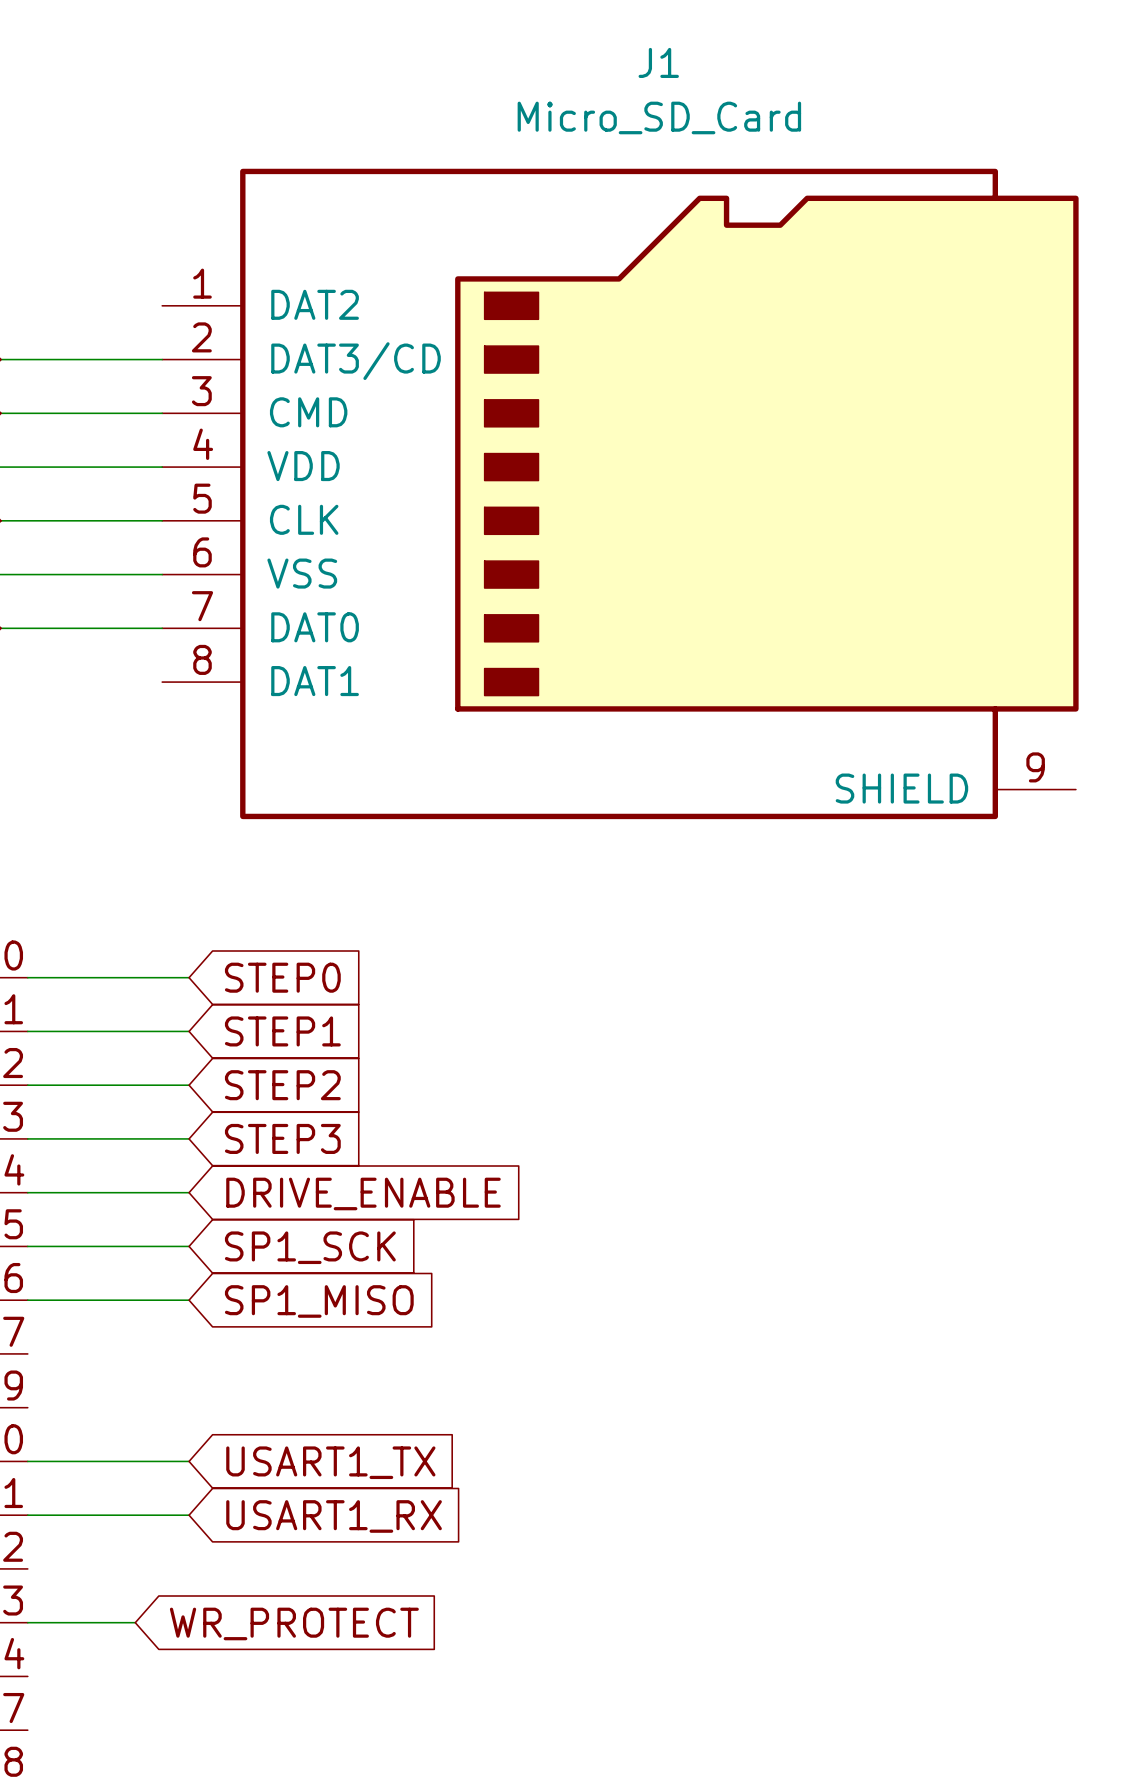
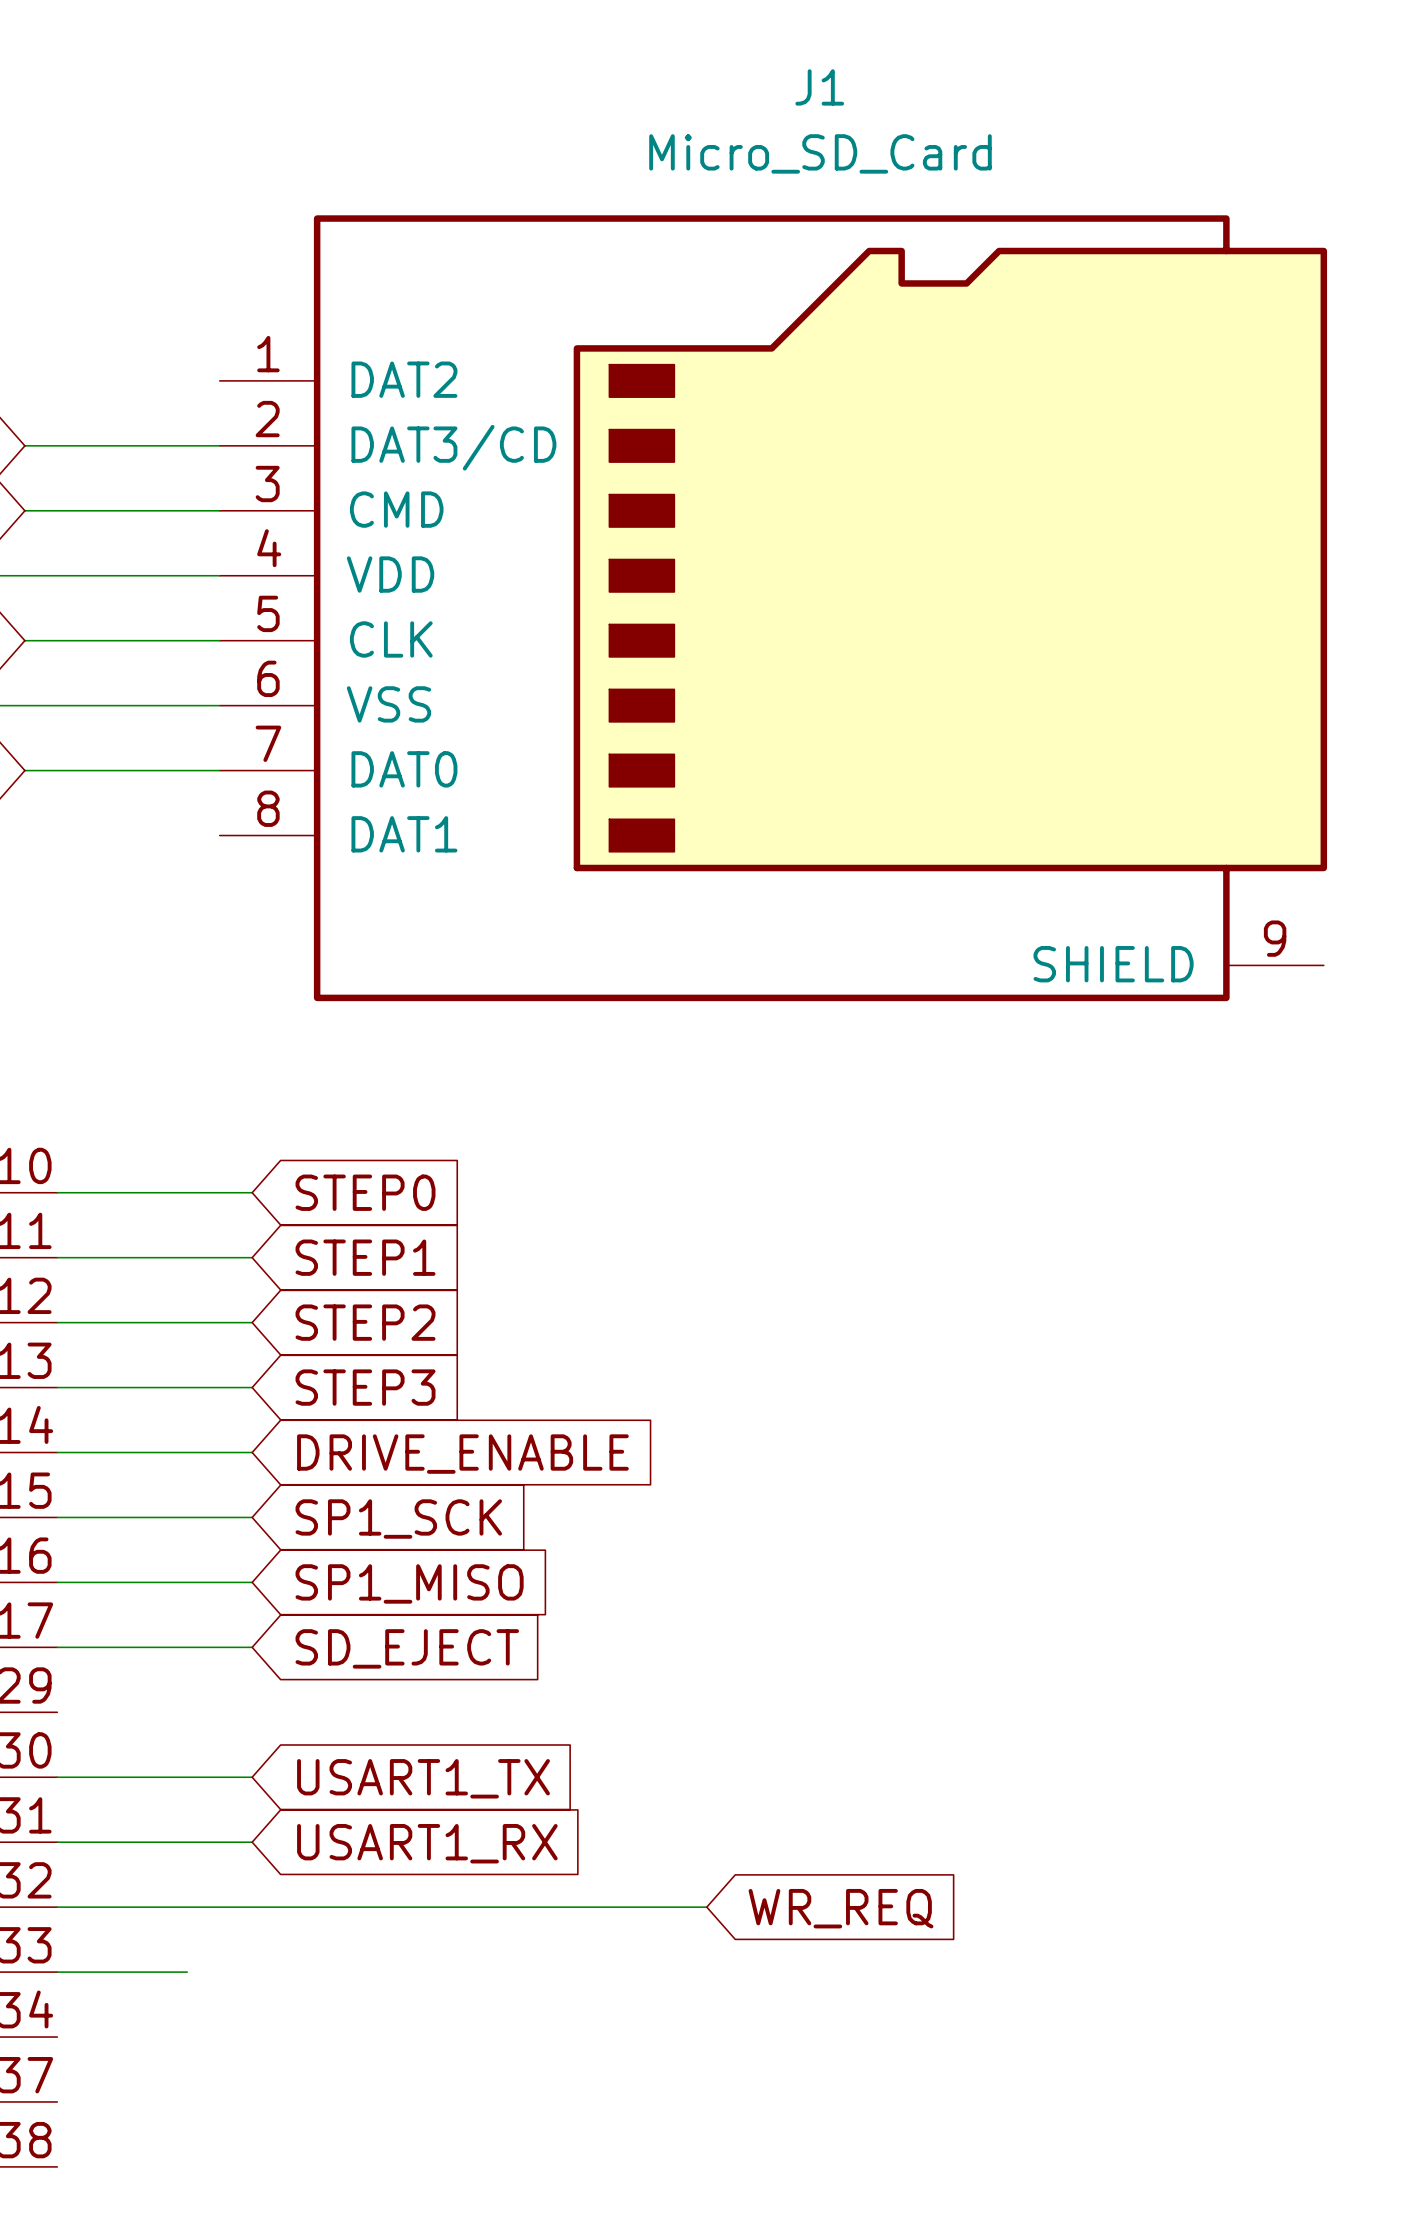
wire: none -> (57, 1647) (252, 1647)
global label: none -> SD_EJECT (407, 1648)
wire: none -> (57, 1907) (706, 1907)
global label: none -> WR_REQ (841, 1908)
global label: WR_PROTECT (294, 1623) -> none

